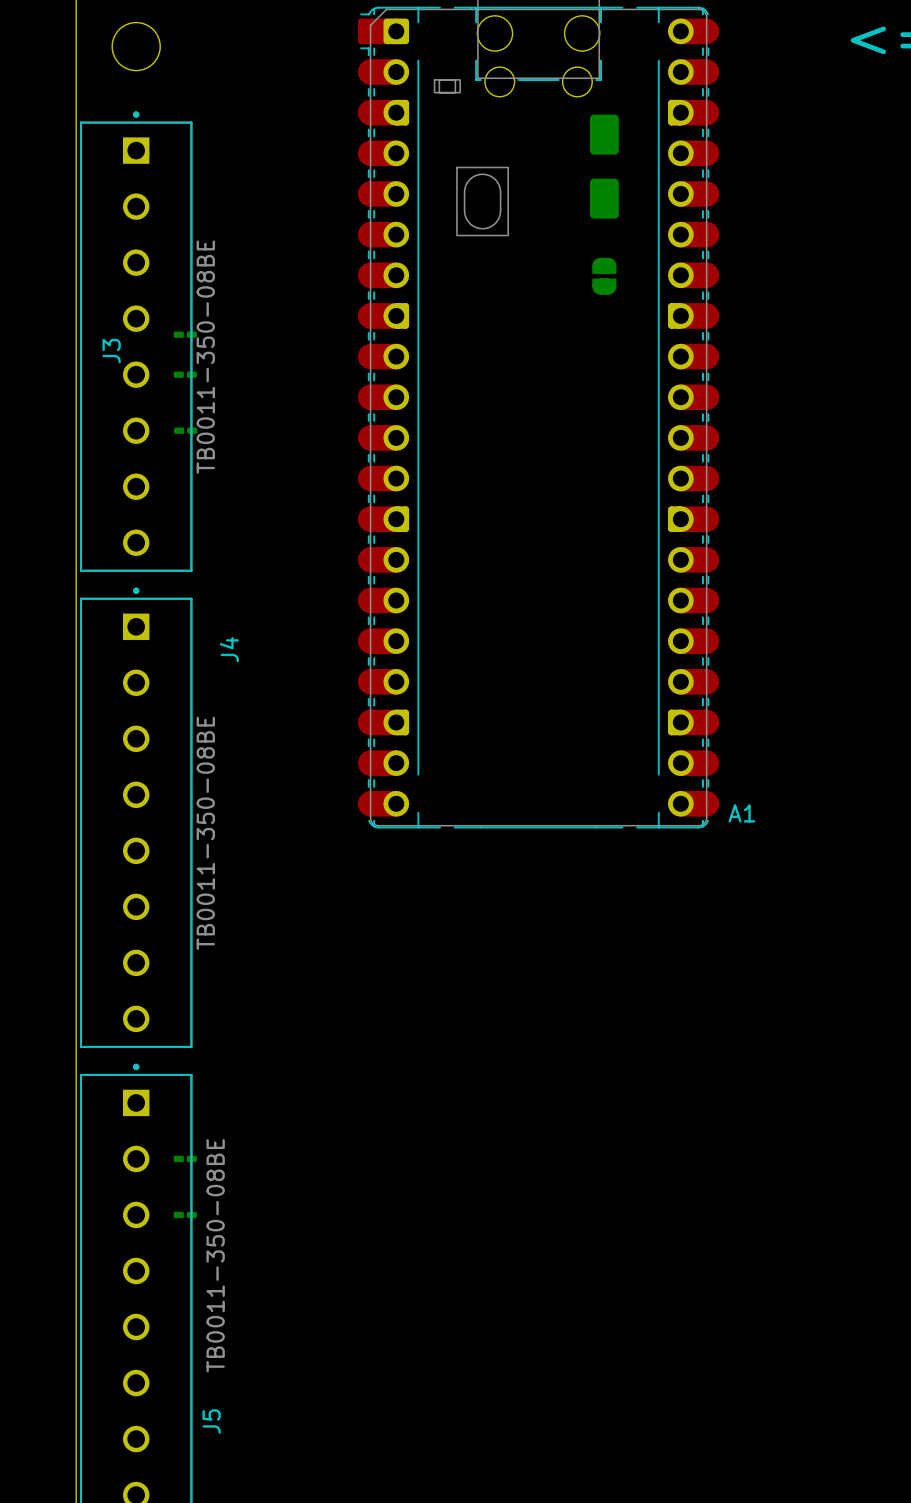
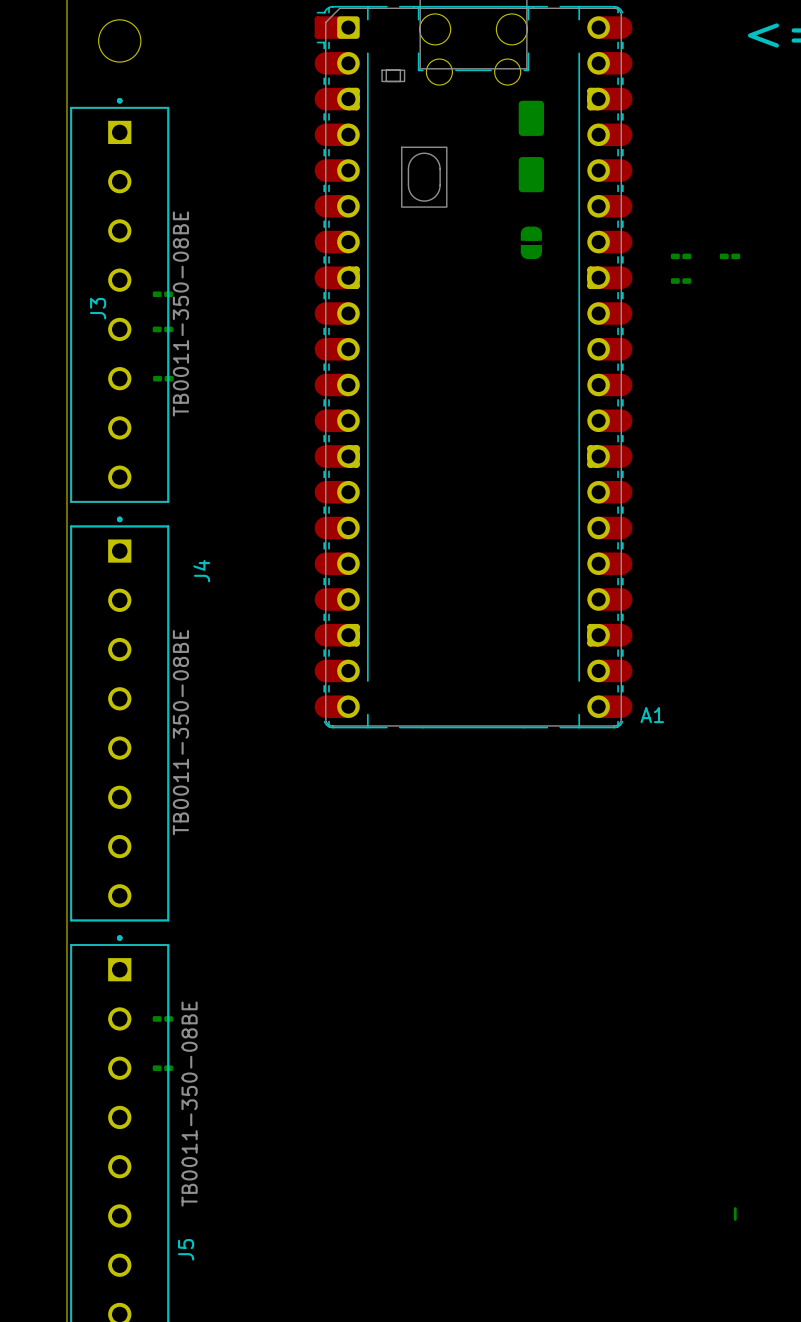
part: none -> (681, 256)
part: none -> (729, 256)
part: none -> (681, 281)
bottom track: none -> (735, 1208) (735, 1219)

